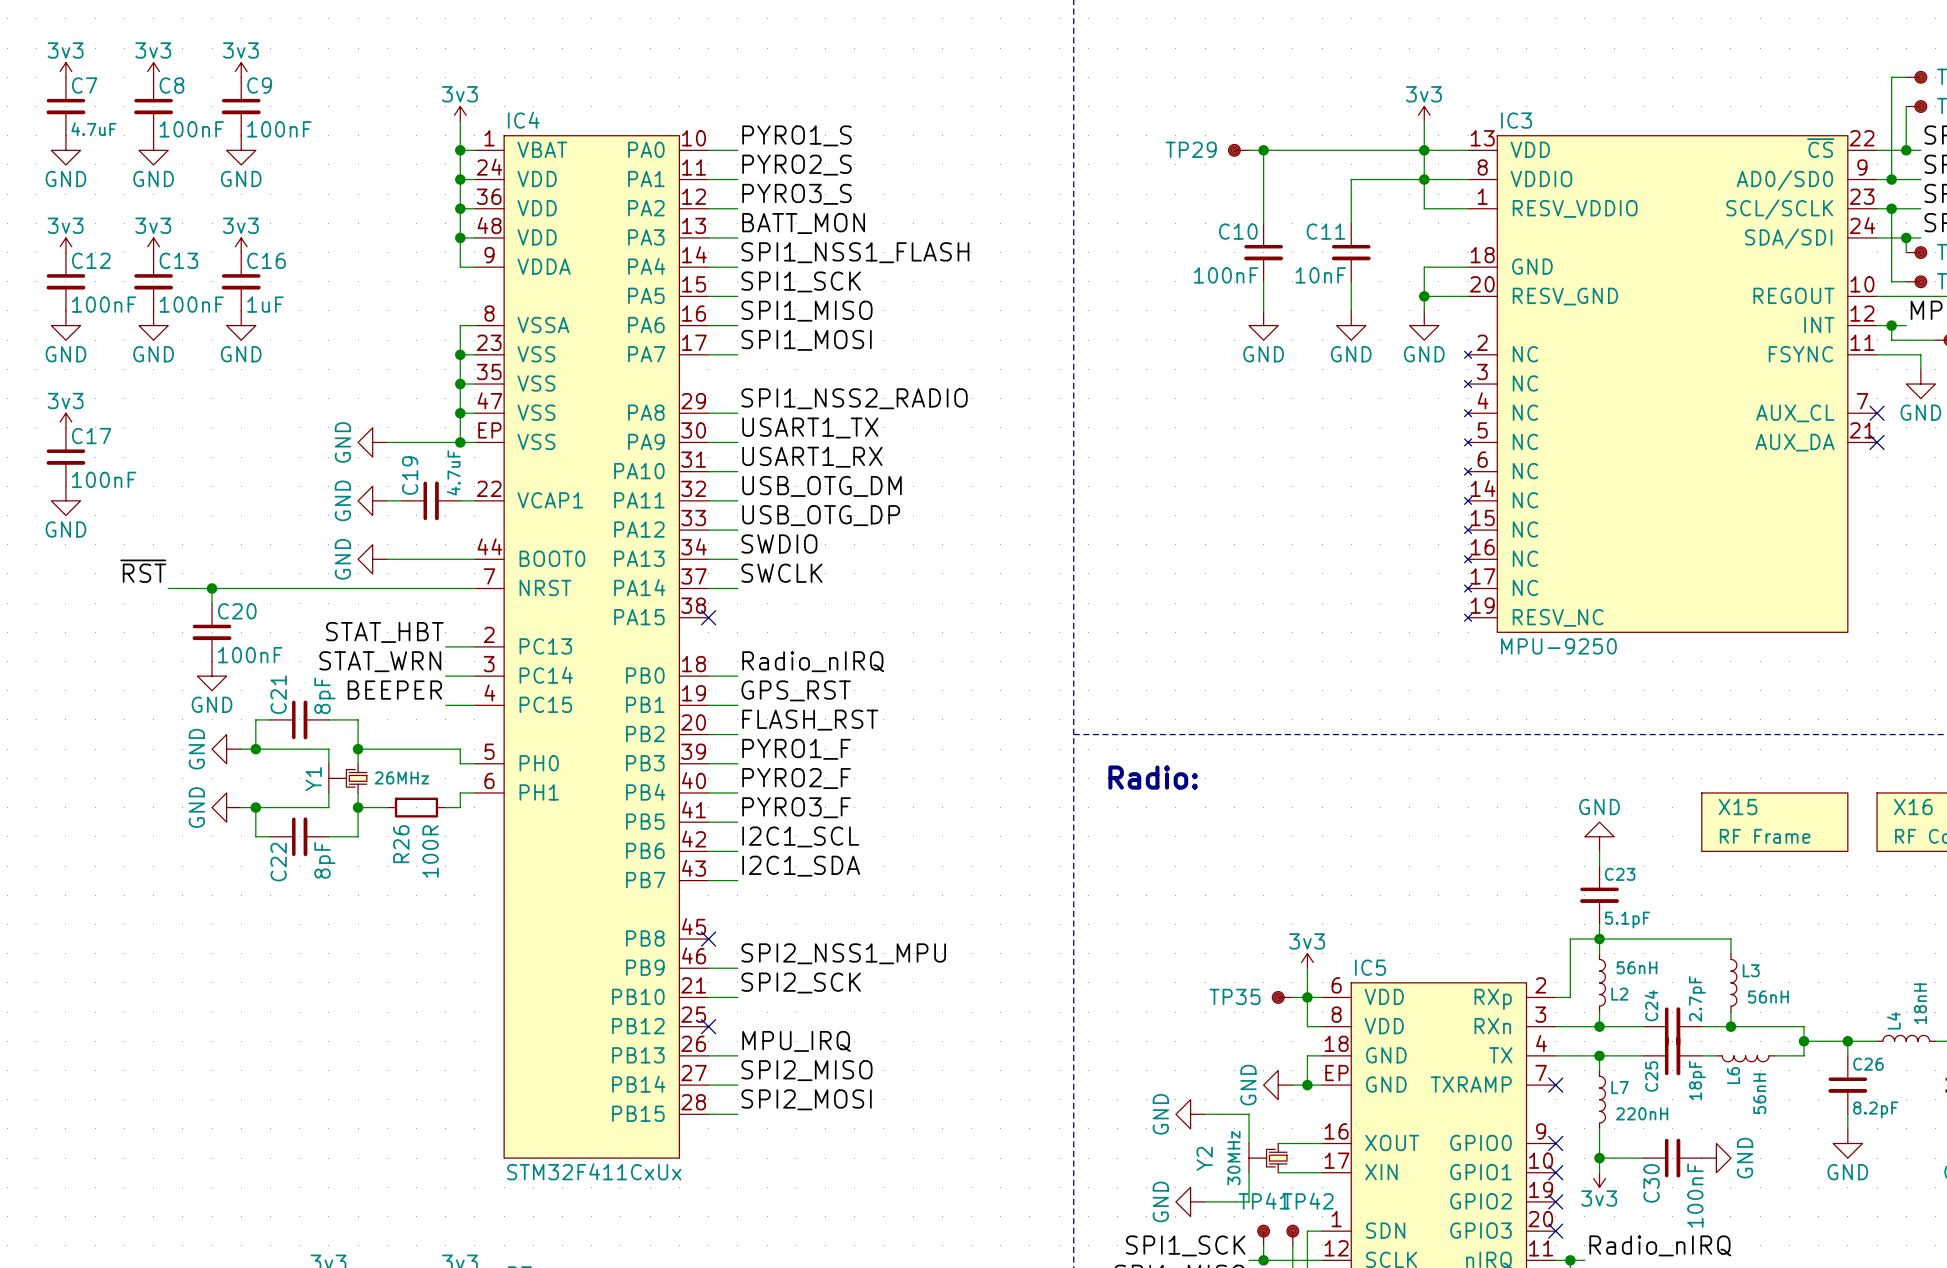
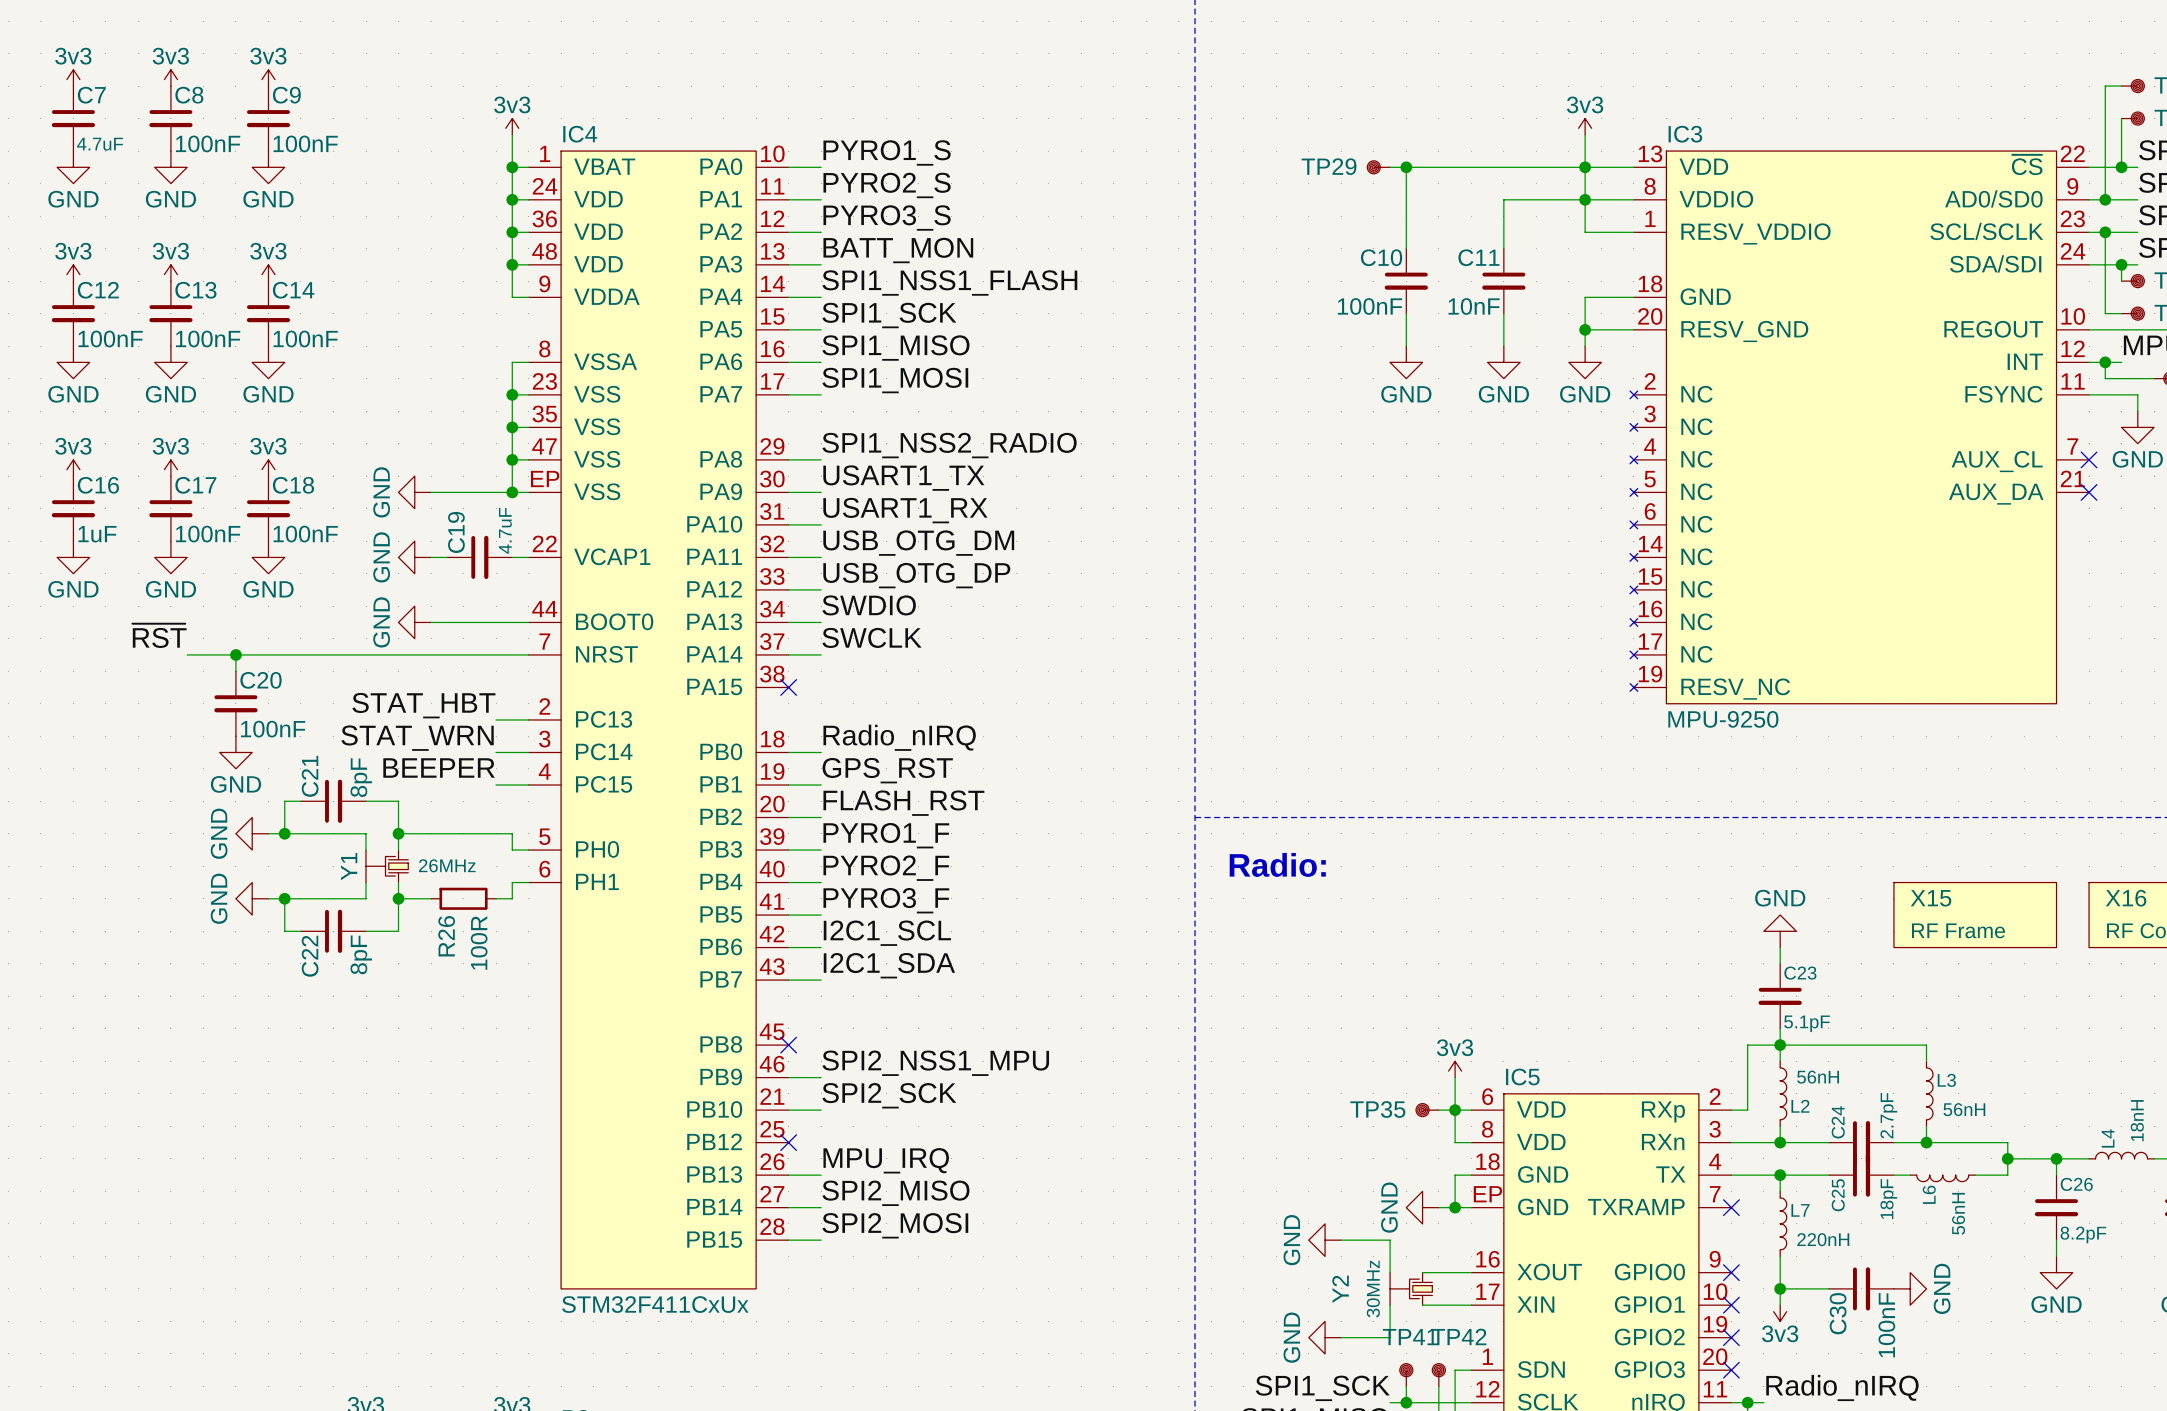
C16 name: C16 (266, 260) -> C14 (293, 290)
C16 value: 1uF (265, 304) -> 100nF (305, 339)
power symbol: none -> 3v3 (170, 468)
power symbol: none -> 3v3 (268, 468)
C17 name: C17 (91, 436) -> C16 (98, 485)
C17: none -> 100nF (170, 508)
C18: none -> 100nF (268, 508)
C17 value: 100nF (104, 479) -> 1uF (97, 534)
power symbol: none -> GND (170, 557)
power symbol: none -> GND (268, 557)

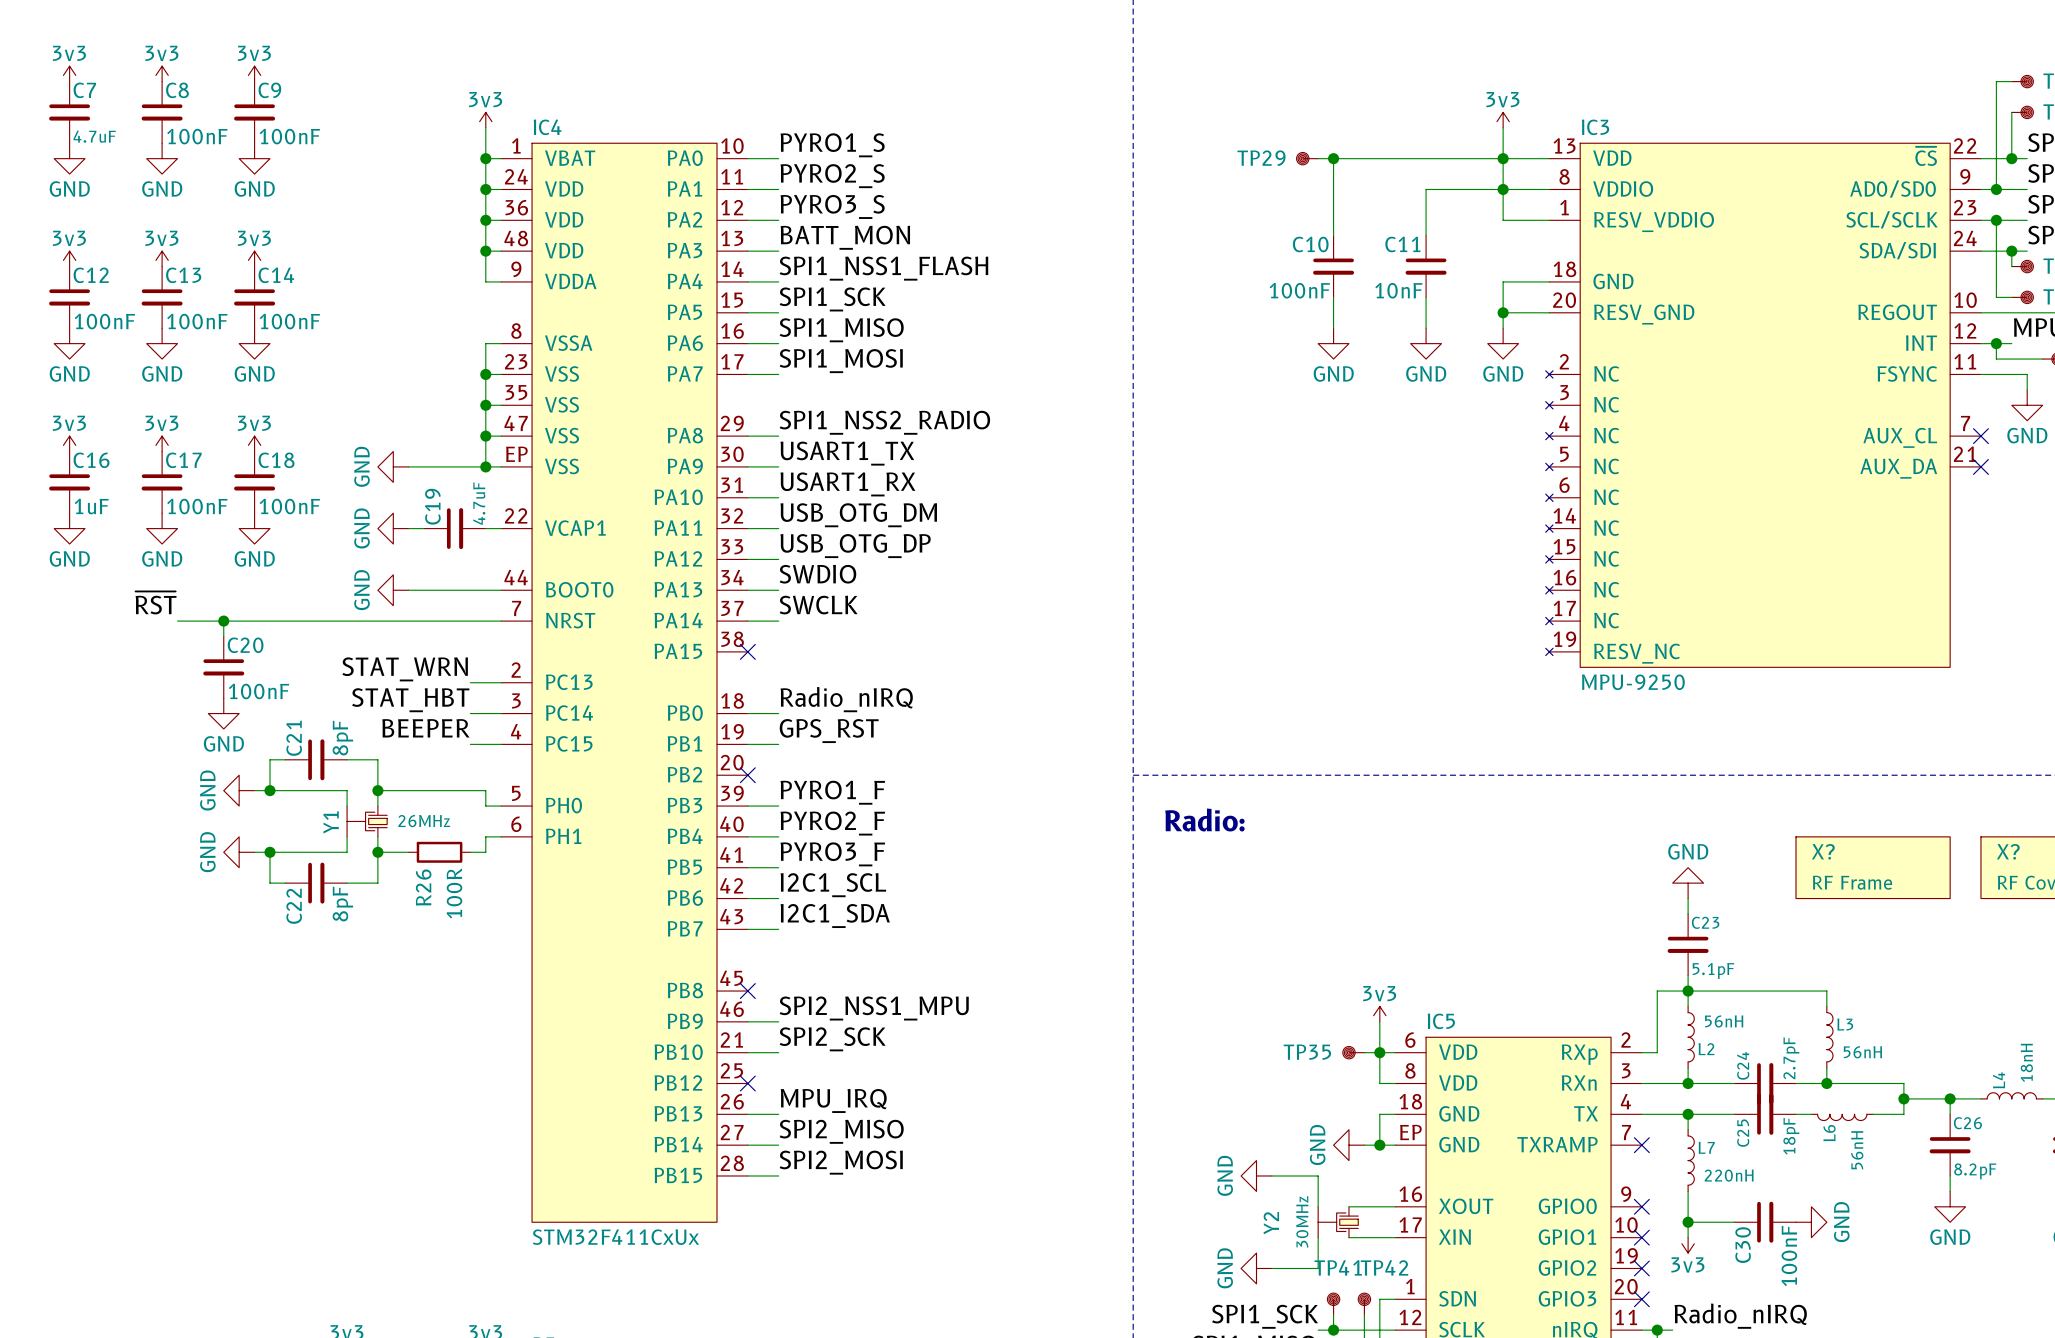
label: STAT_HBT (423, 705) -> STAT_WRN (405, 669)
label: STAT_WRN (417, 738) -> STAT_HBT (410, 700)
label: FLASH_RST (903, 803) -> none
wire: (788, 817) (821, 817) -> none
no-connect mark: none -> (747, 775)
X15 name: X15 (1931, 898) -> X? (1823, 851)
X16 name: X16 (2126, 898) -> X? (2008, 851)

